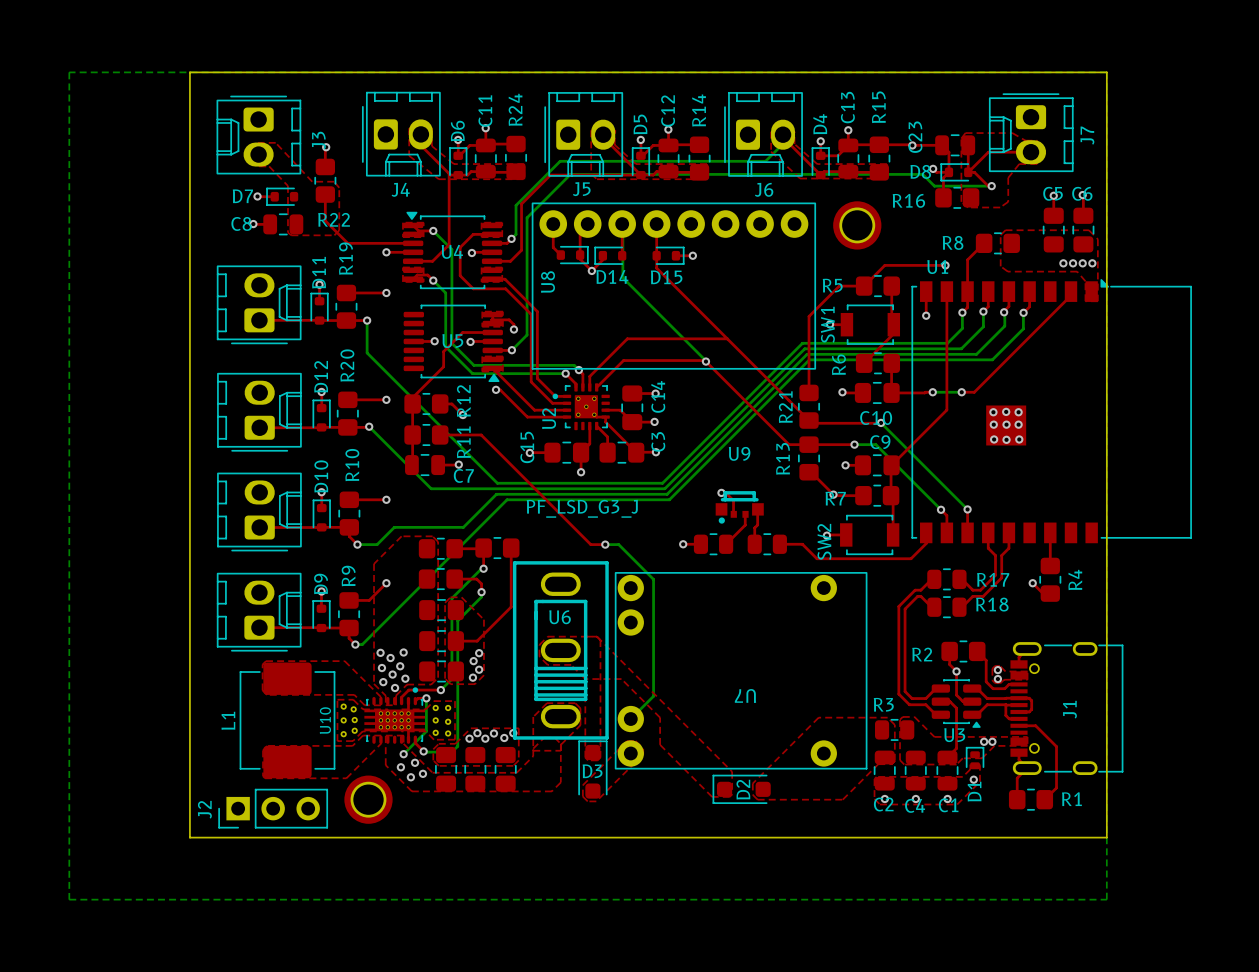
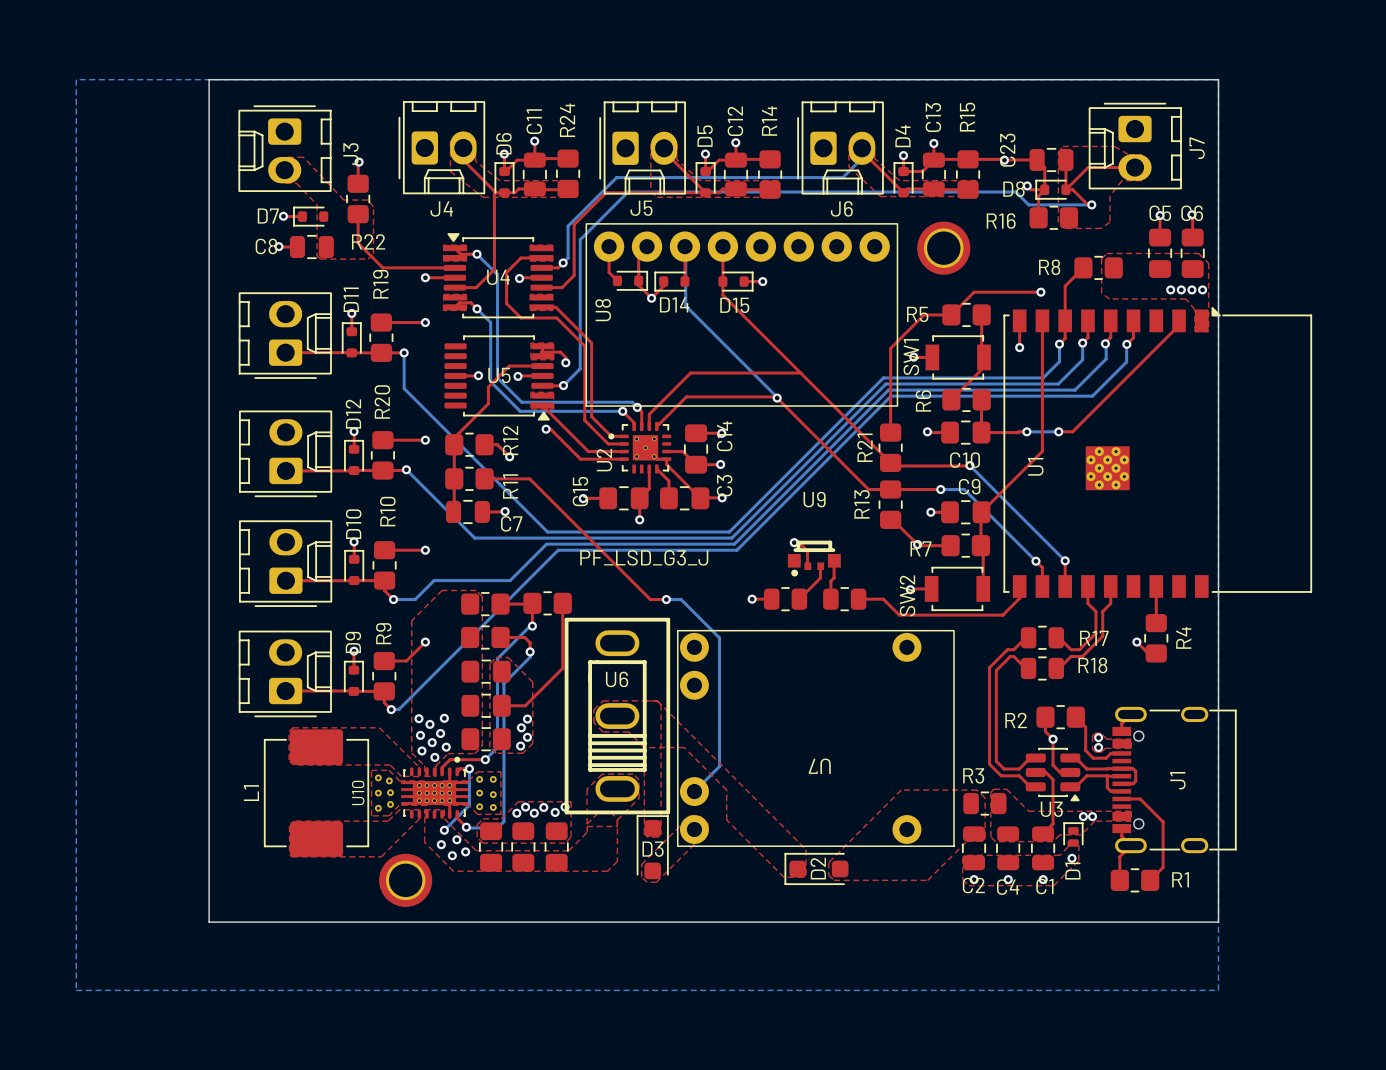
U1 name position: U1 (937, 267) -> U1 (1035, 466)
U1 footprint: [911, 279, 1192, 544] -> [1003, 307, 1313, 598]
via: (1006, 411) -> none
via: (993, 412) -> none
via: (1018, 412) -> none
via: (993, 424) -> none
via: (1006, 424) -> none
via: (1018, 424) -> none
via: (994, 439) -> none
via: (1006, 439) -> none
via: (1019, 439) -> none
J2: (273, 808) -> none

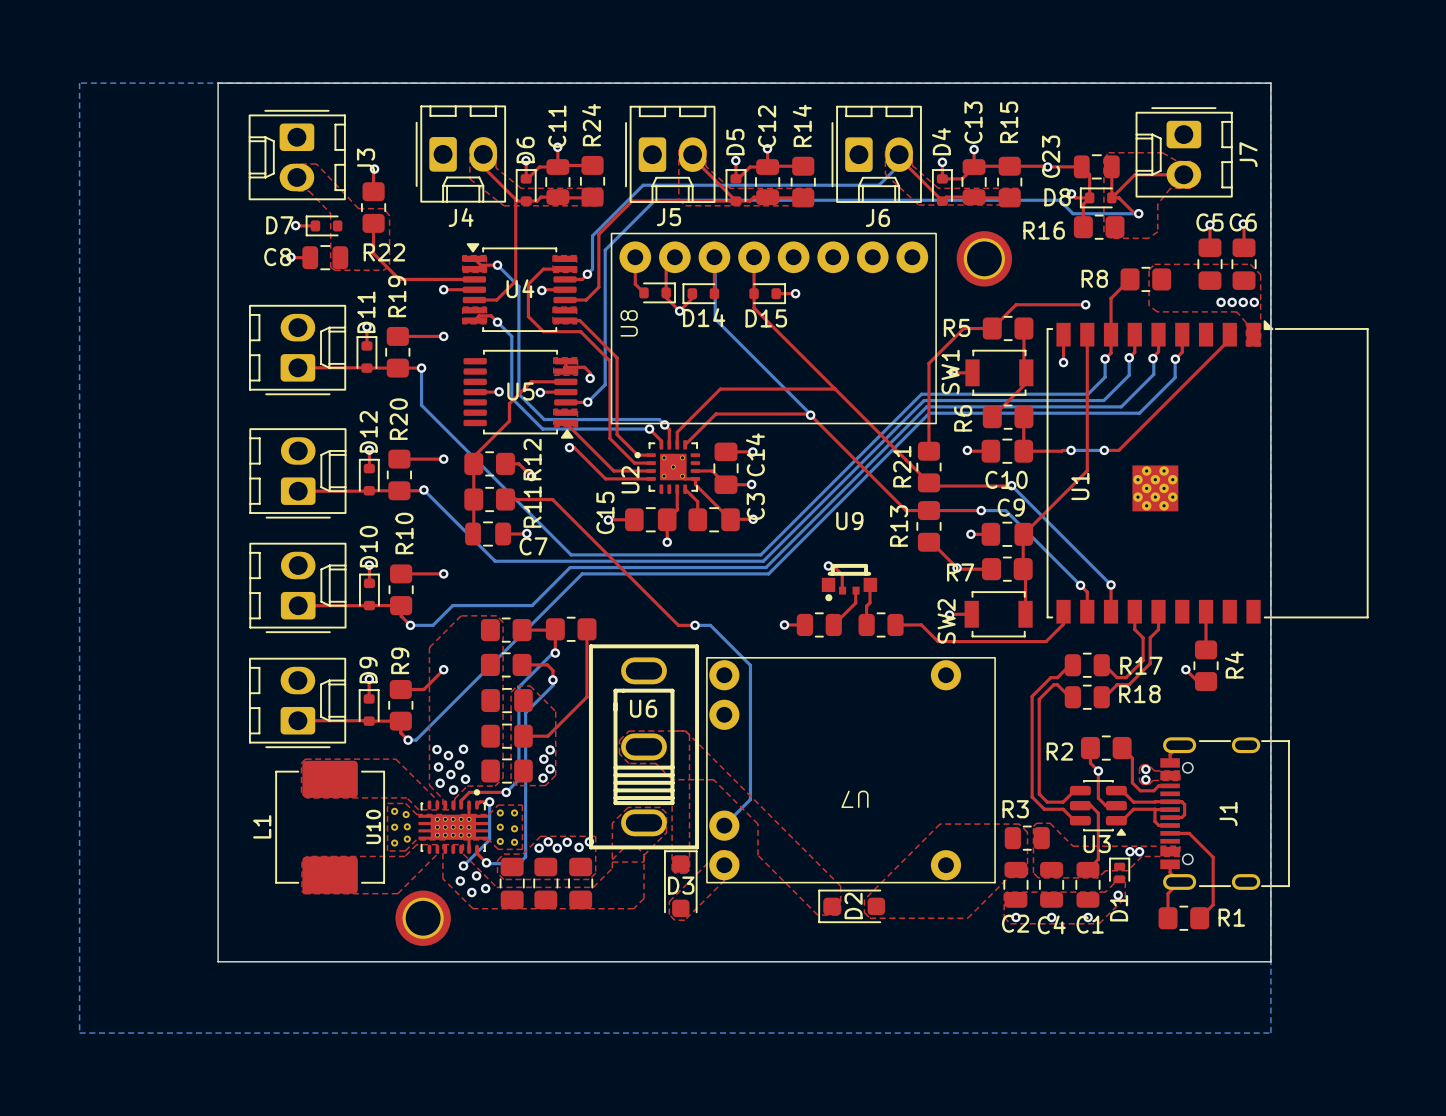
text: PF_LSD_G3_J (644, 557) -> none

